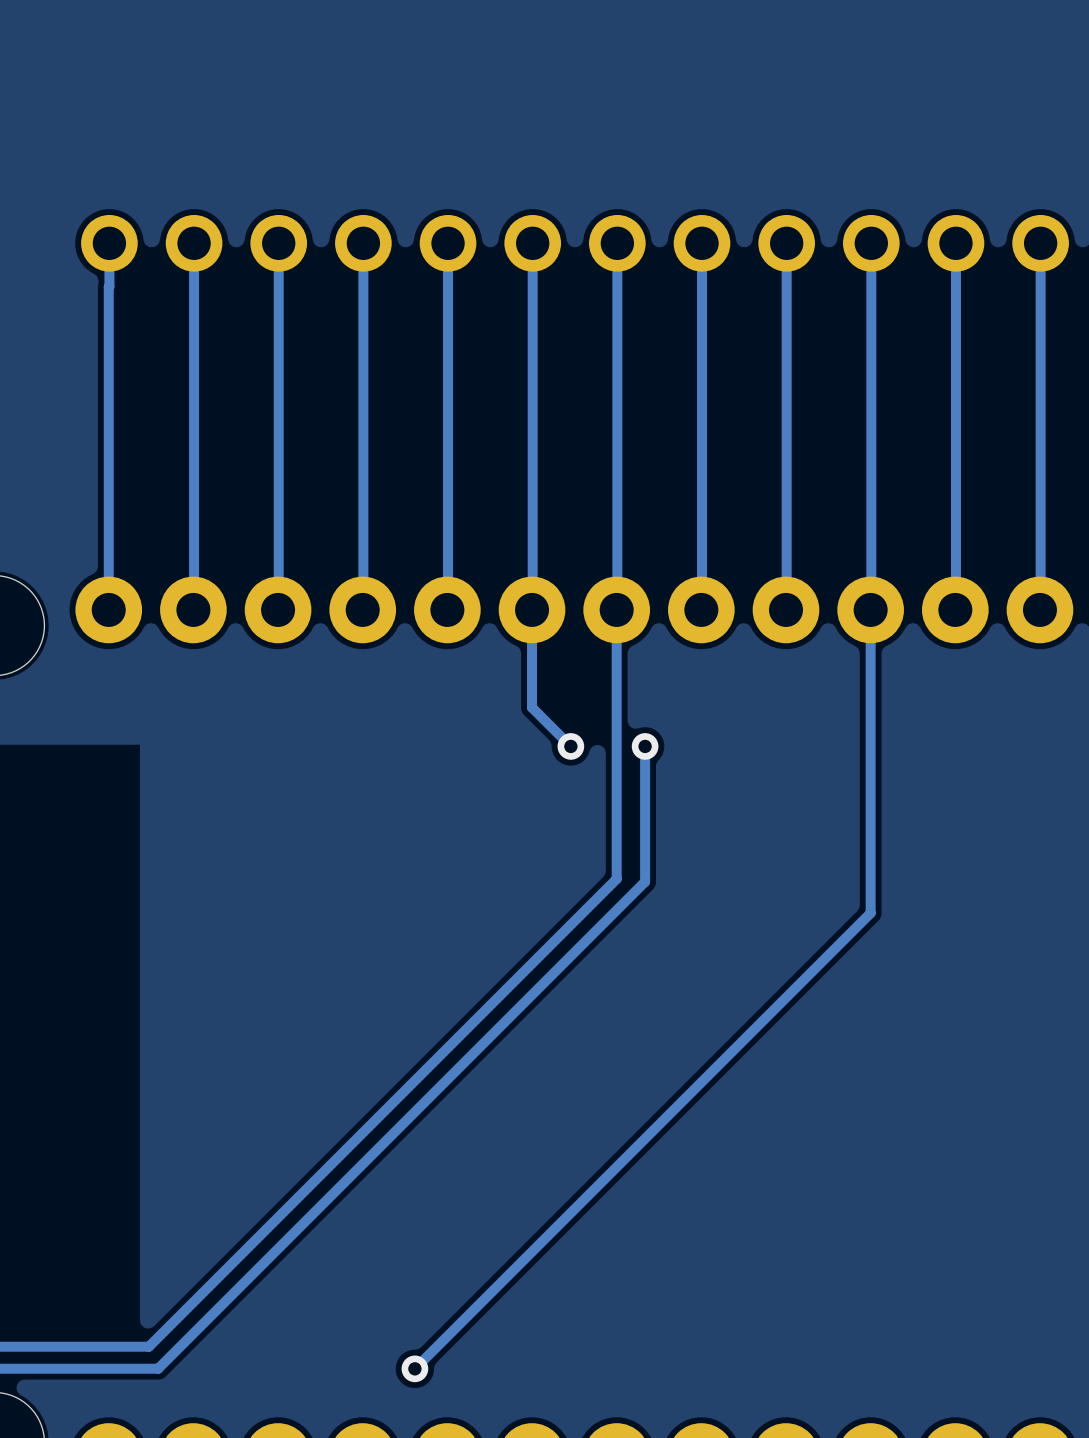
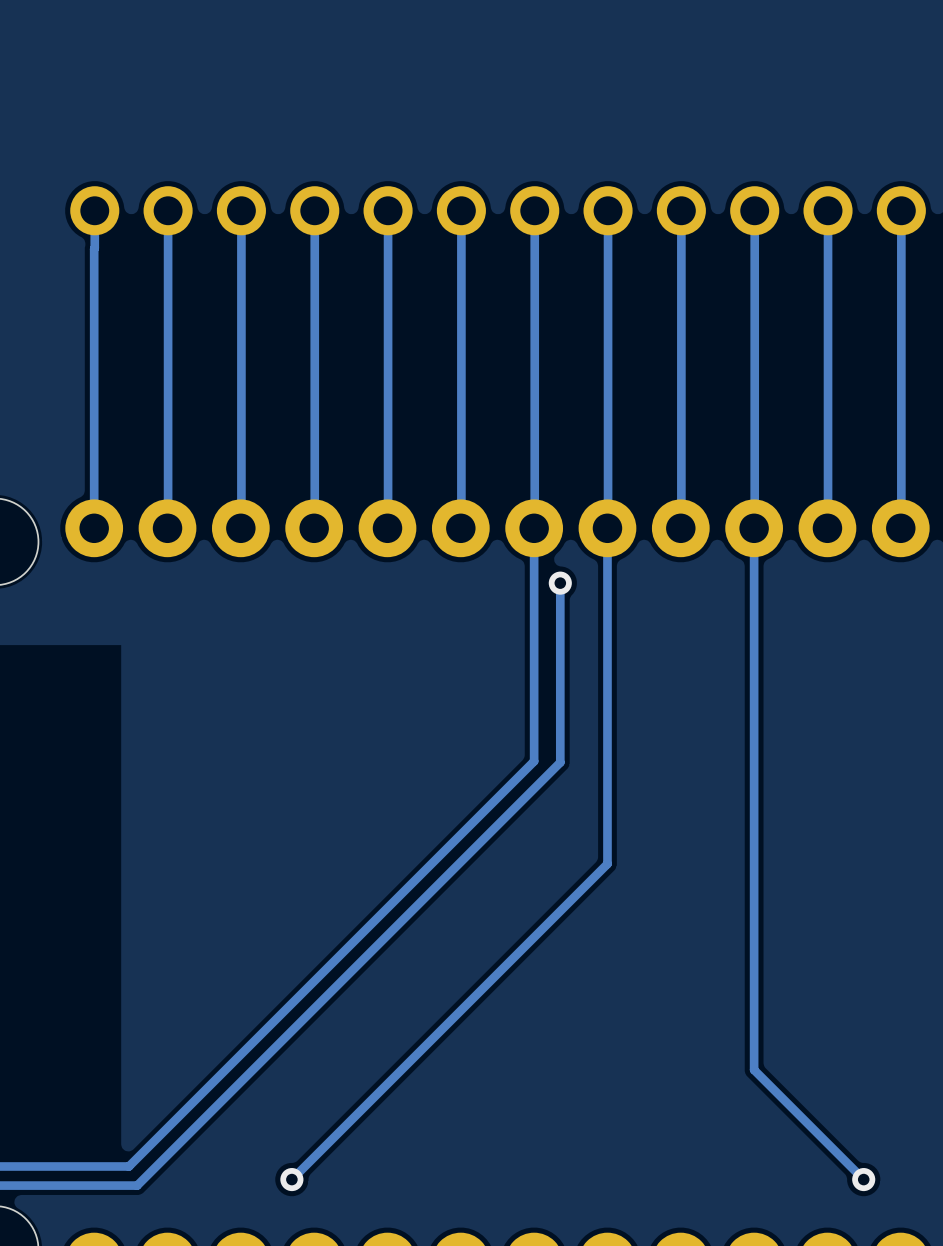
track: (532, 609) (532, 707) (570, 746) -> none
track: none -> (607, 528) (607, 863) (291, 1179)
via: none -> (560, 583)
via: (570, 746) -> none
track: (645, 746) (645, 881) (158, 1368) -> (560, 583) (560, 762) (137, 1185)
via: (645, 746) -> none
track: (870, 913) (414, 1368) -> (754, 790) (754, 1069) (863, 1179)
via: none -> (863, 1179)
via position: (414, 1368) -> (291, 1179)

